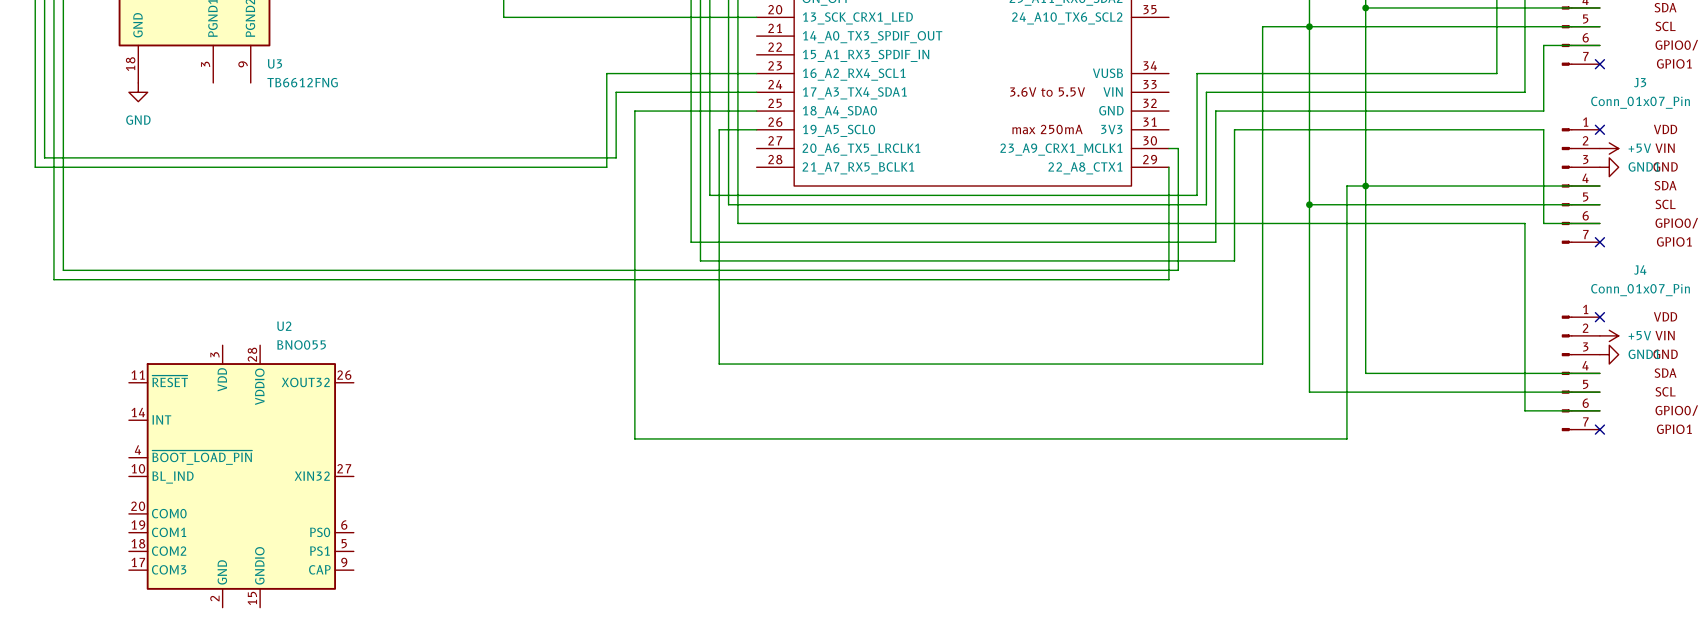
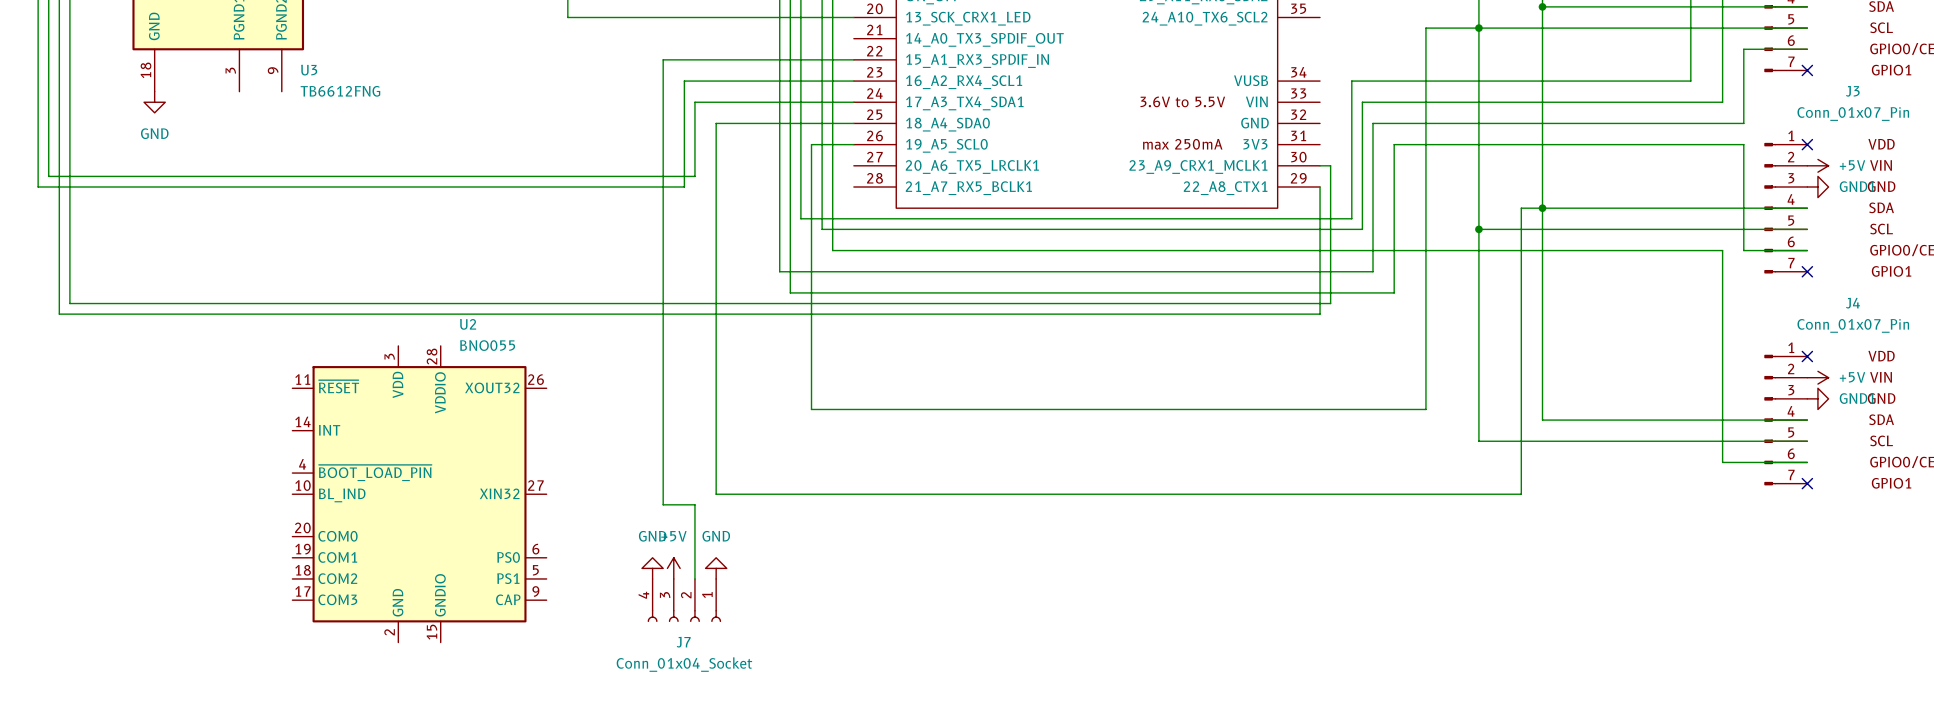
wire: none -> (853, 59) (663, 59) (663, 504) (694, 504) (694, 578)
U2 position: (241, 476) -> (419, 494)
power symbol: none -> GND (652, 568)
power symbol: none -> +5V (673, 568)
power symbol: none -> GND (716, 568)
J7: none -> Conn_01x04_Socket (684, 600)

